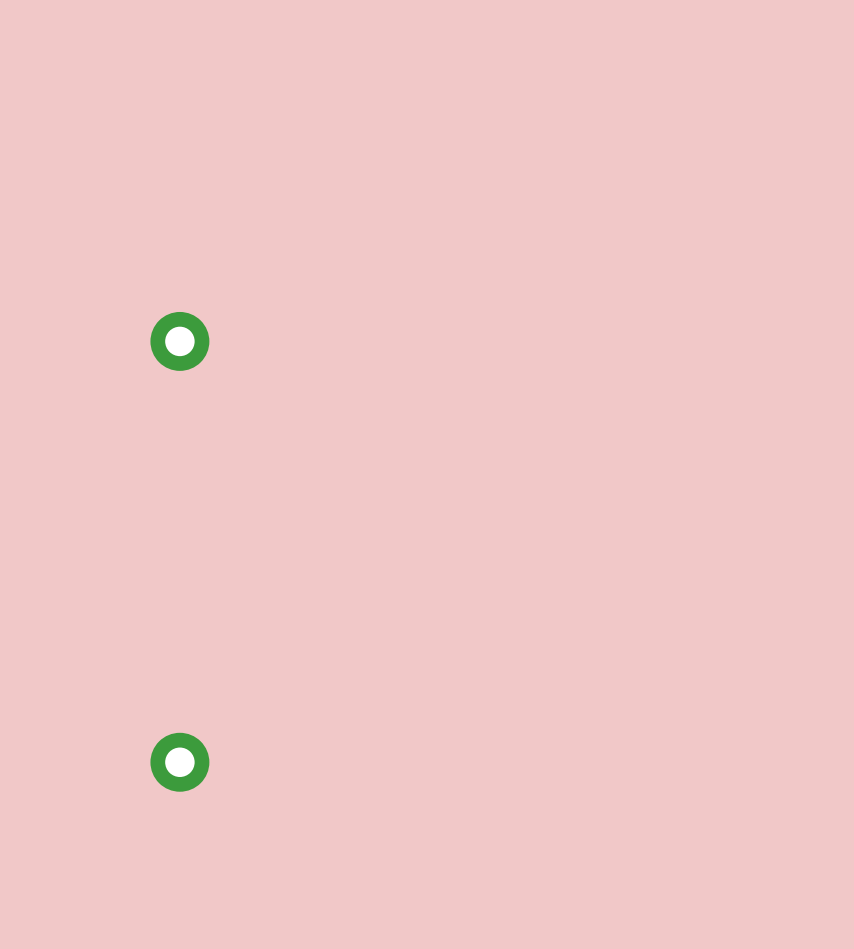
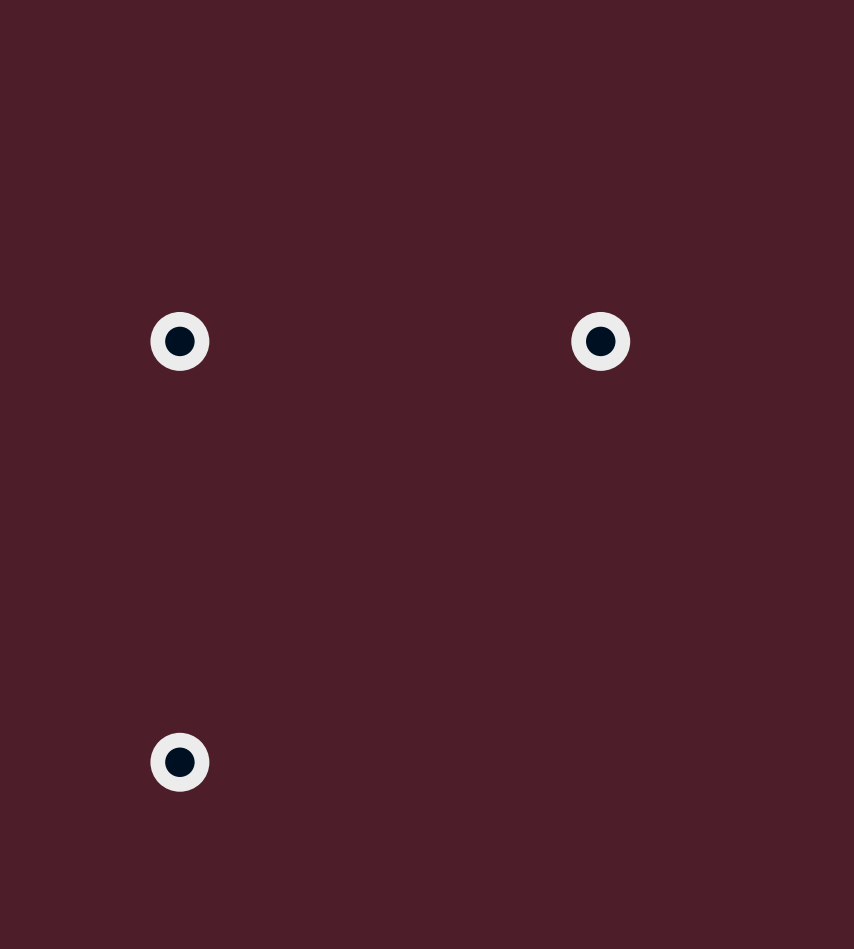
via: none -> (600, 341)

